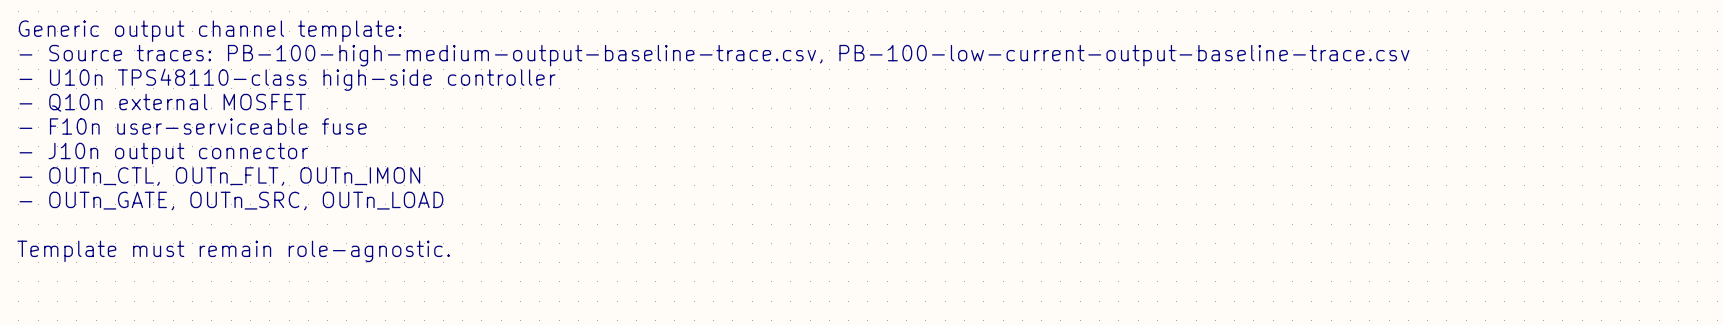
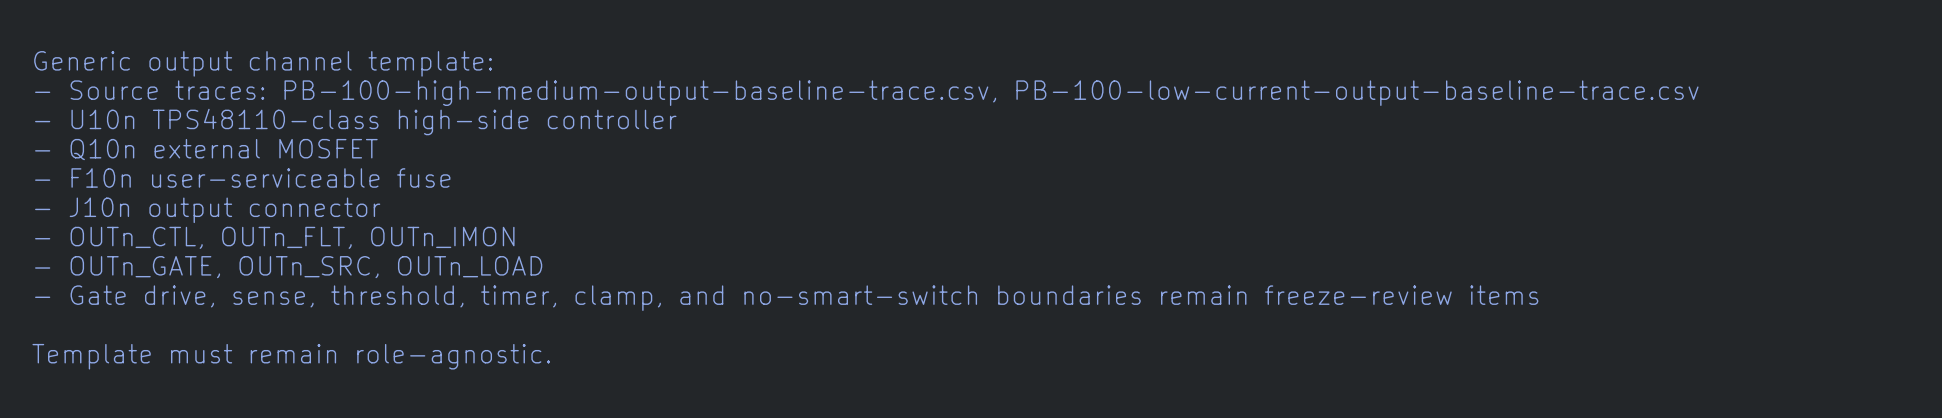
text: none -> - Gate drive, sense, threshold, timer, clamp, and no-smart-switch boundaries remain freeze-review items (786, 298)
text position: Template must remain role-agnostic. (233, 251) -> Template must remain role-agnostic. (291, 356)

